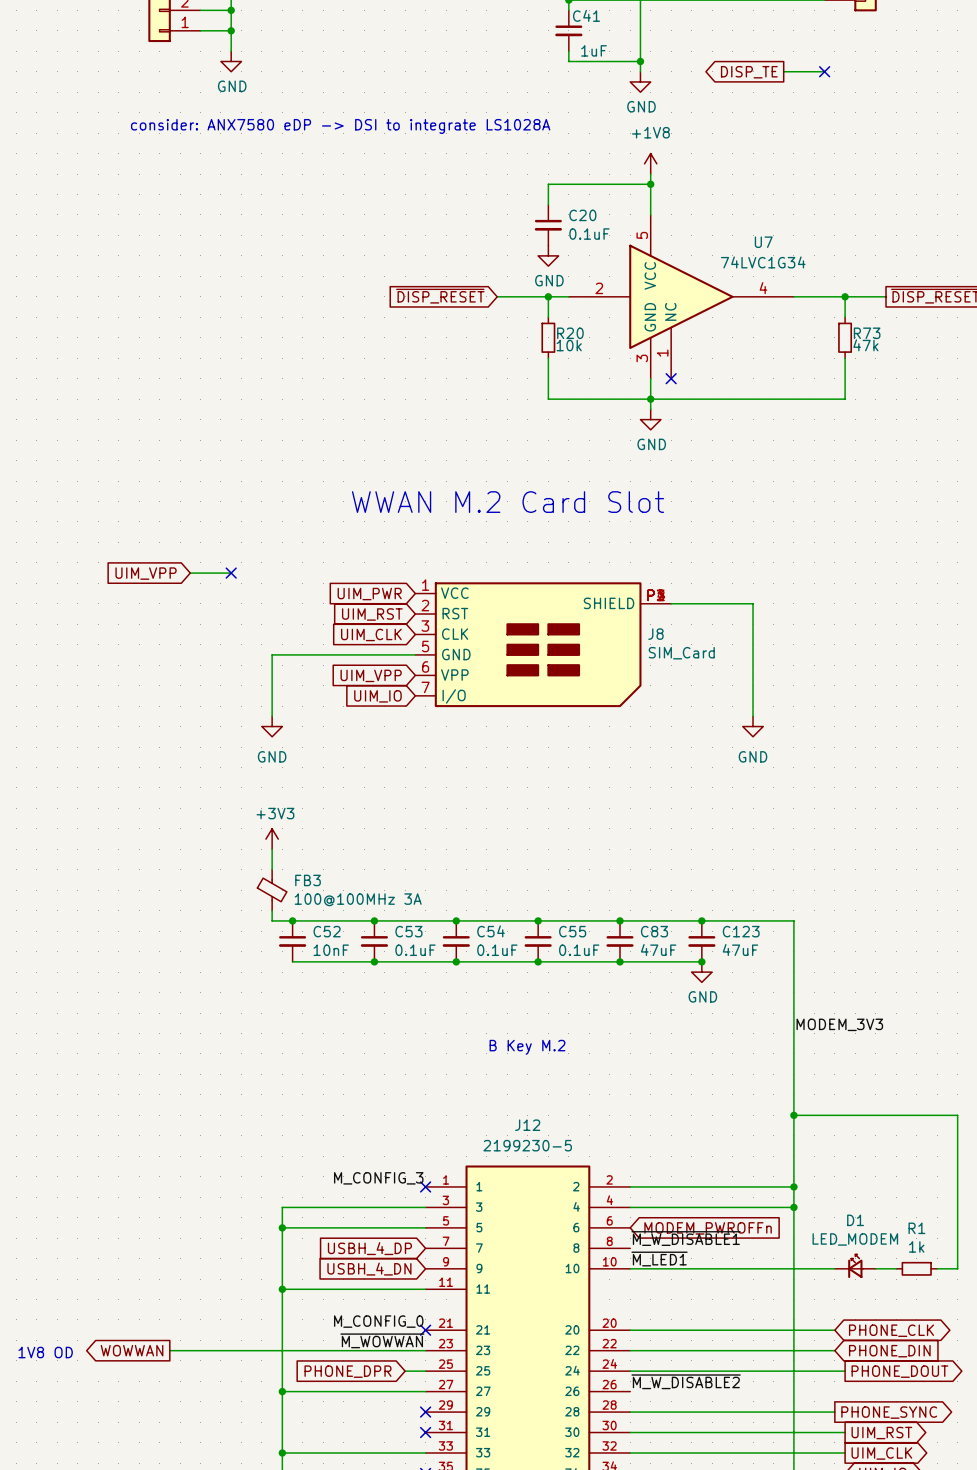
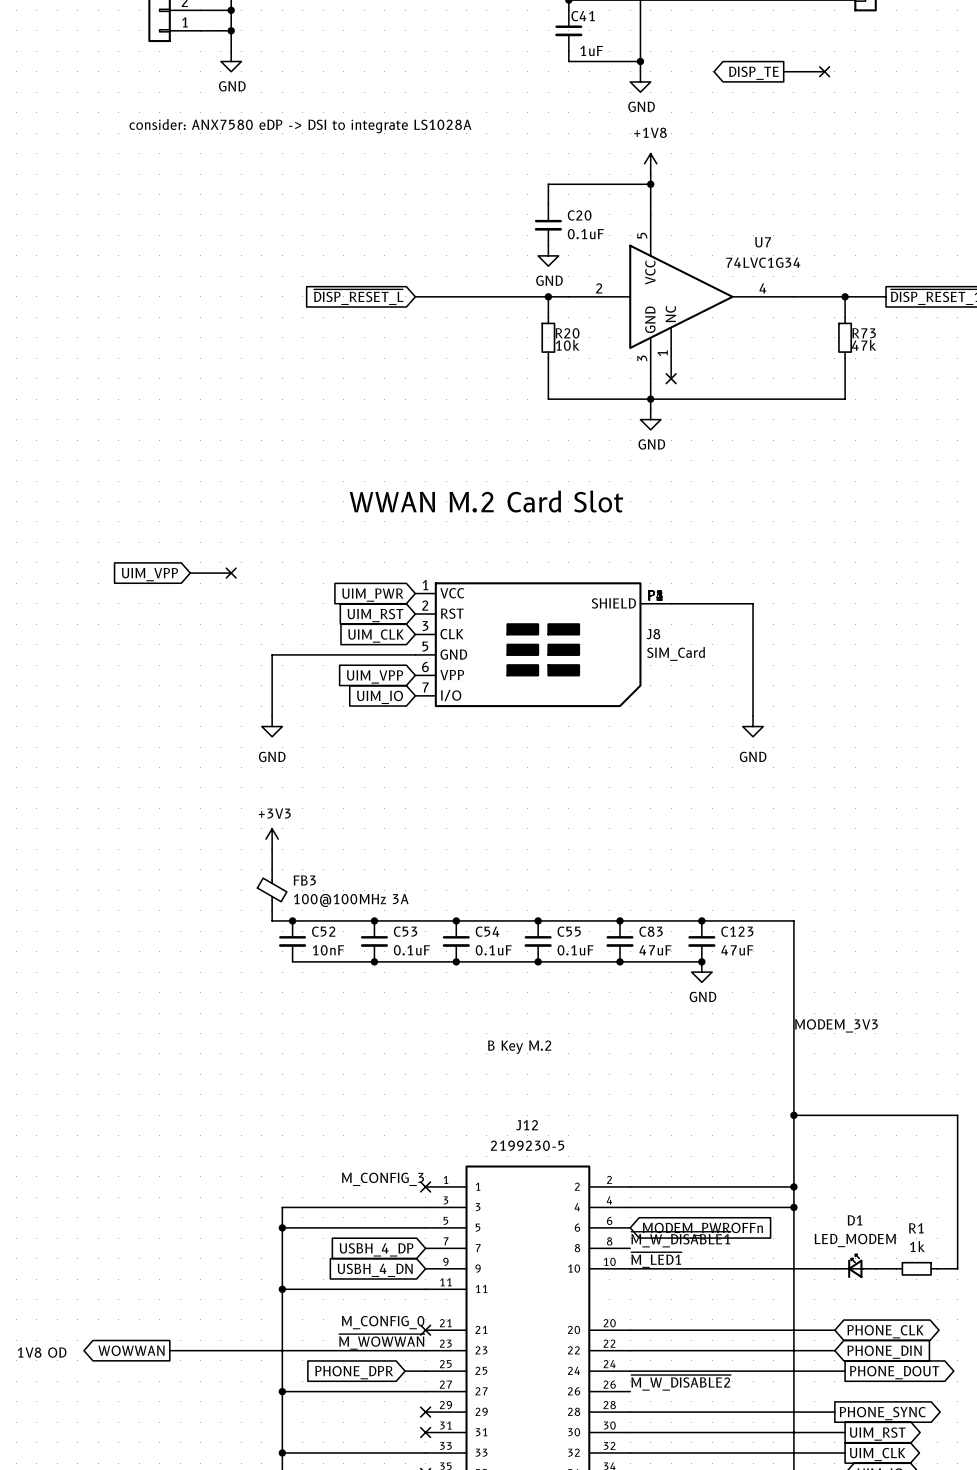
wire: none -> (415, 296) (497, 296)
global label: ~{DISP_RESET} (440, 296) -> ~{DISP_RESET_L} (358, 297)

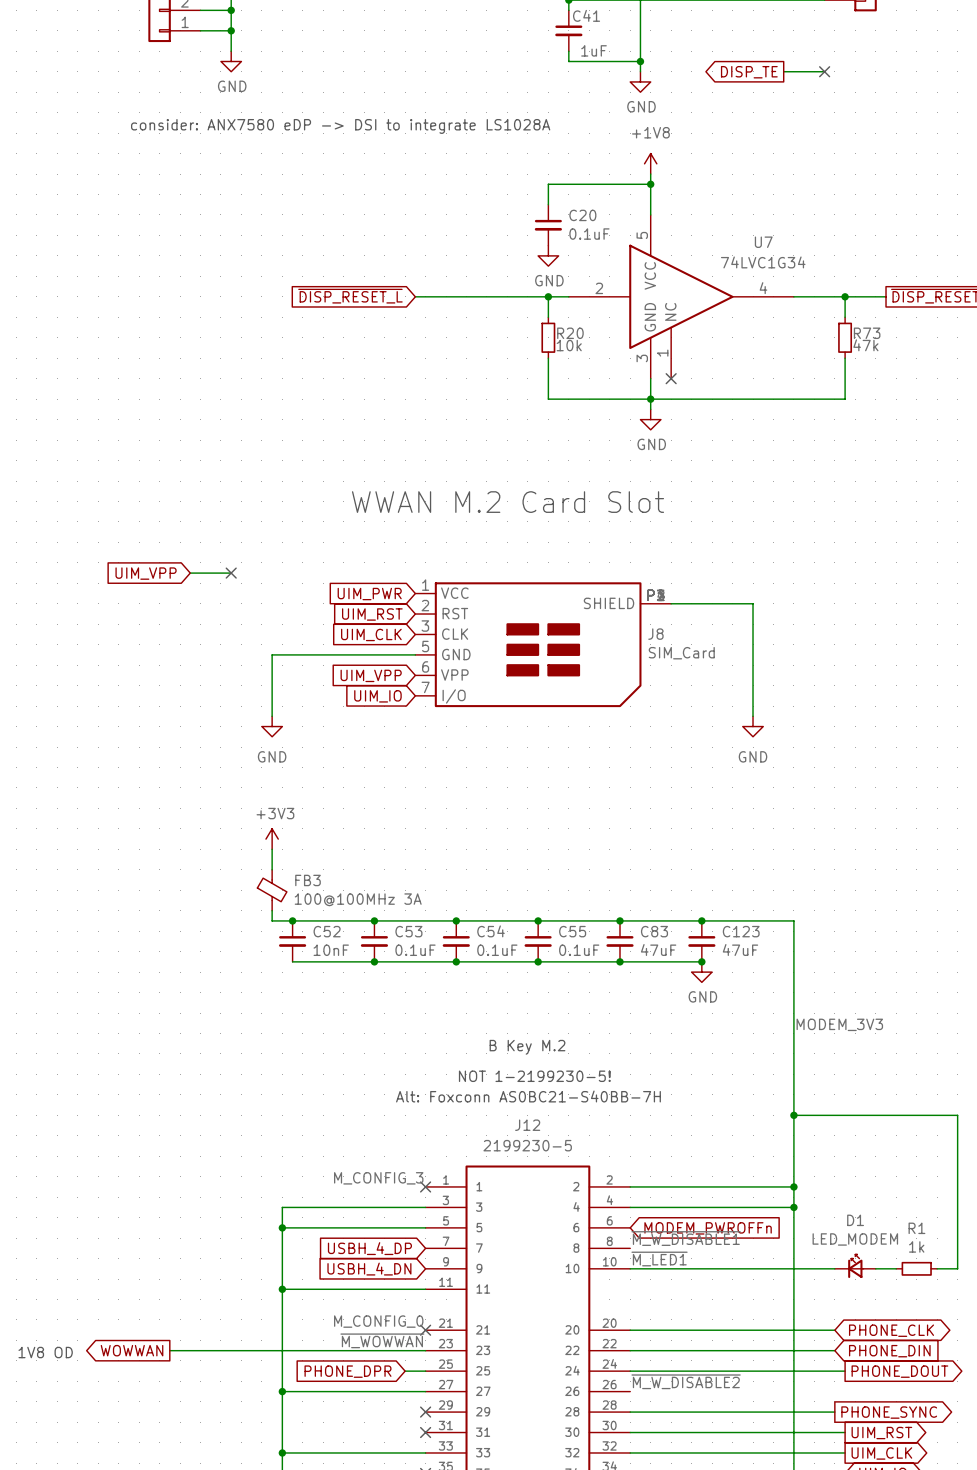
text: none -> NOT 1-2199230-5! (534, 1076)
text: none -> Alt: Foxconn AS0BC21-S40BB-7H (528, 1096)

